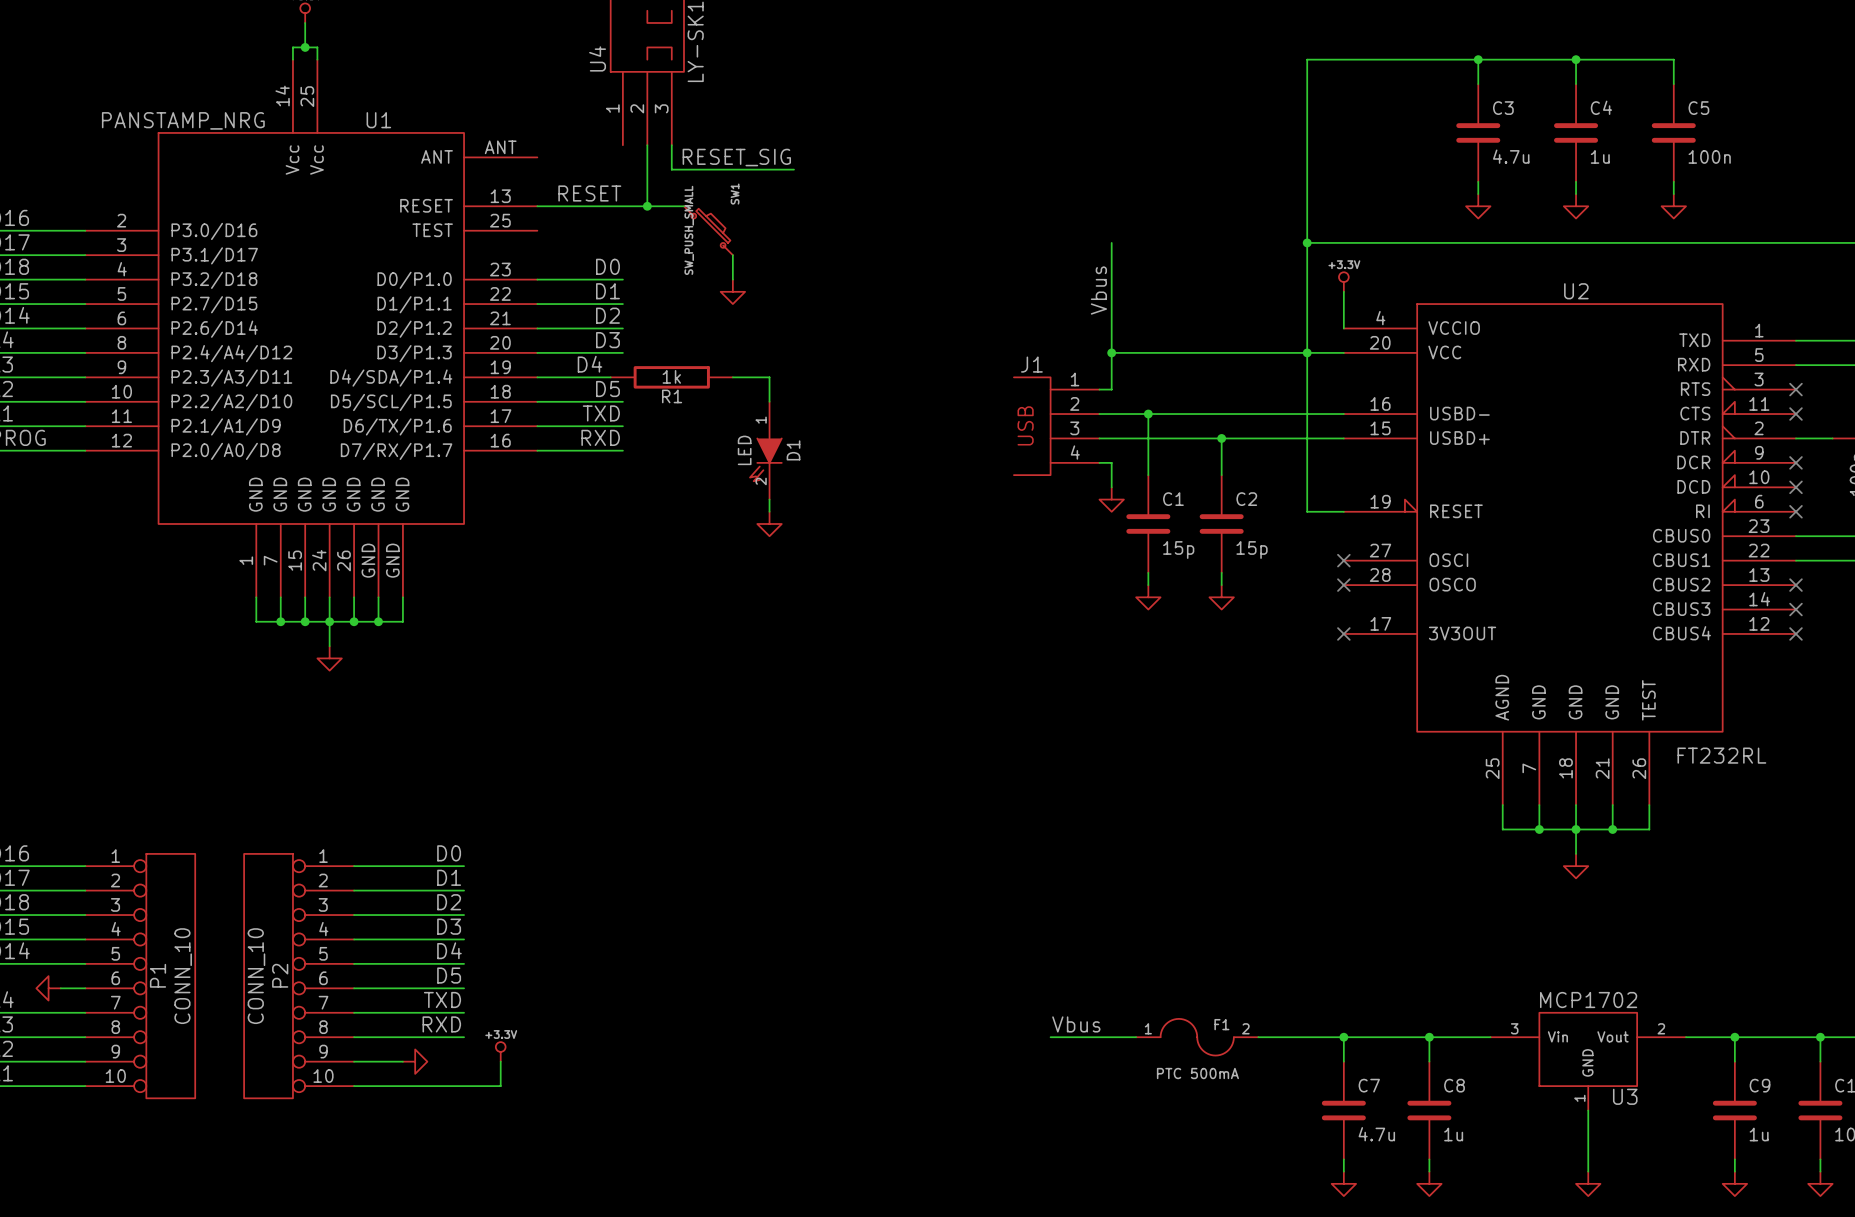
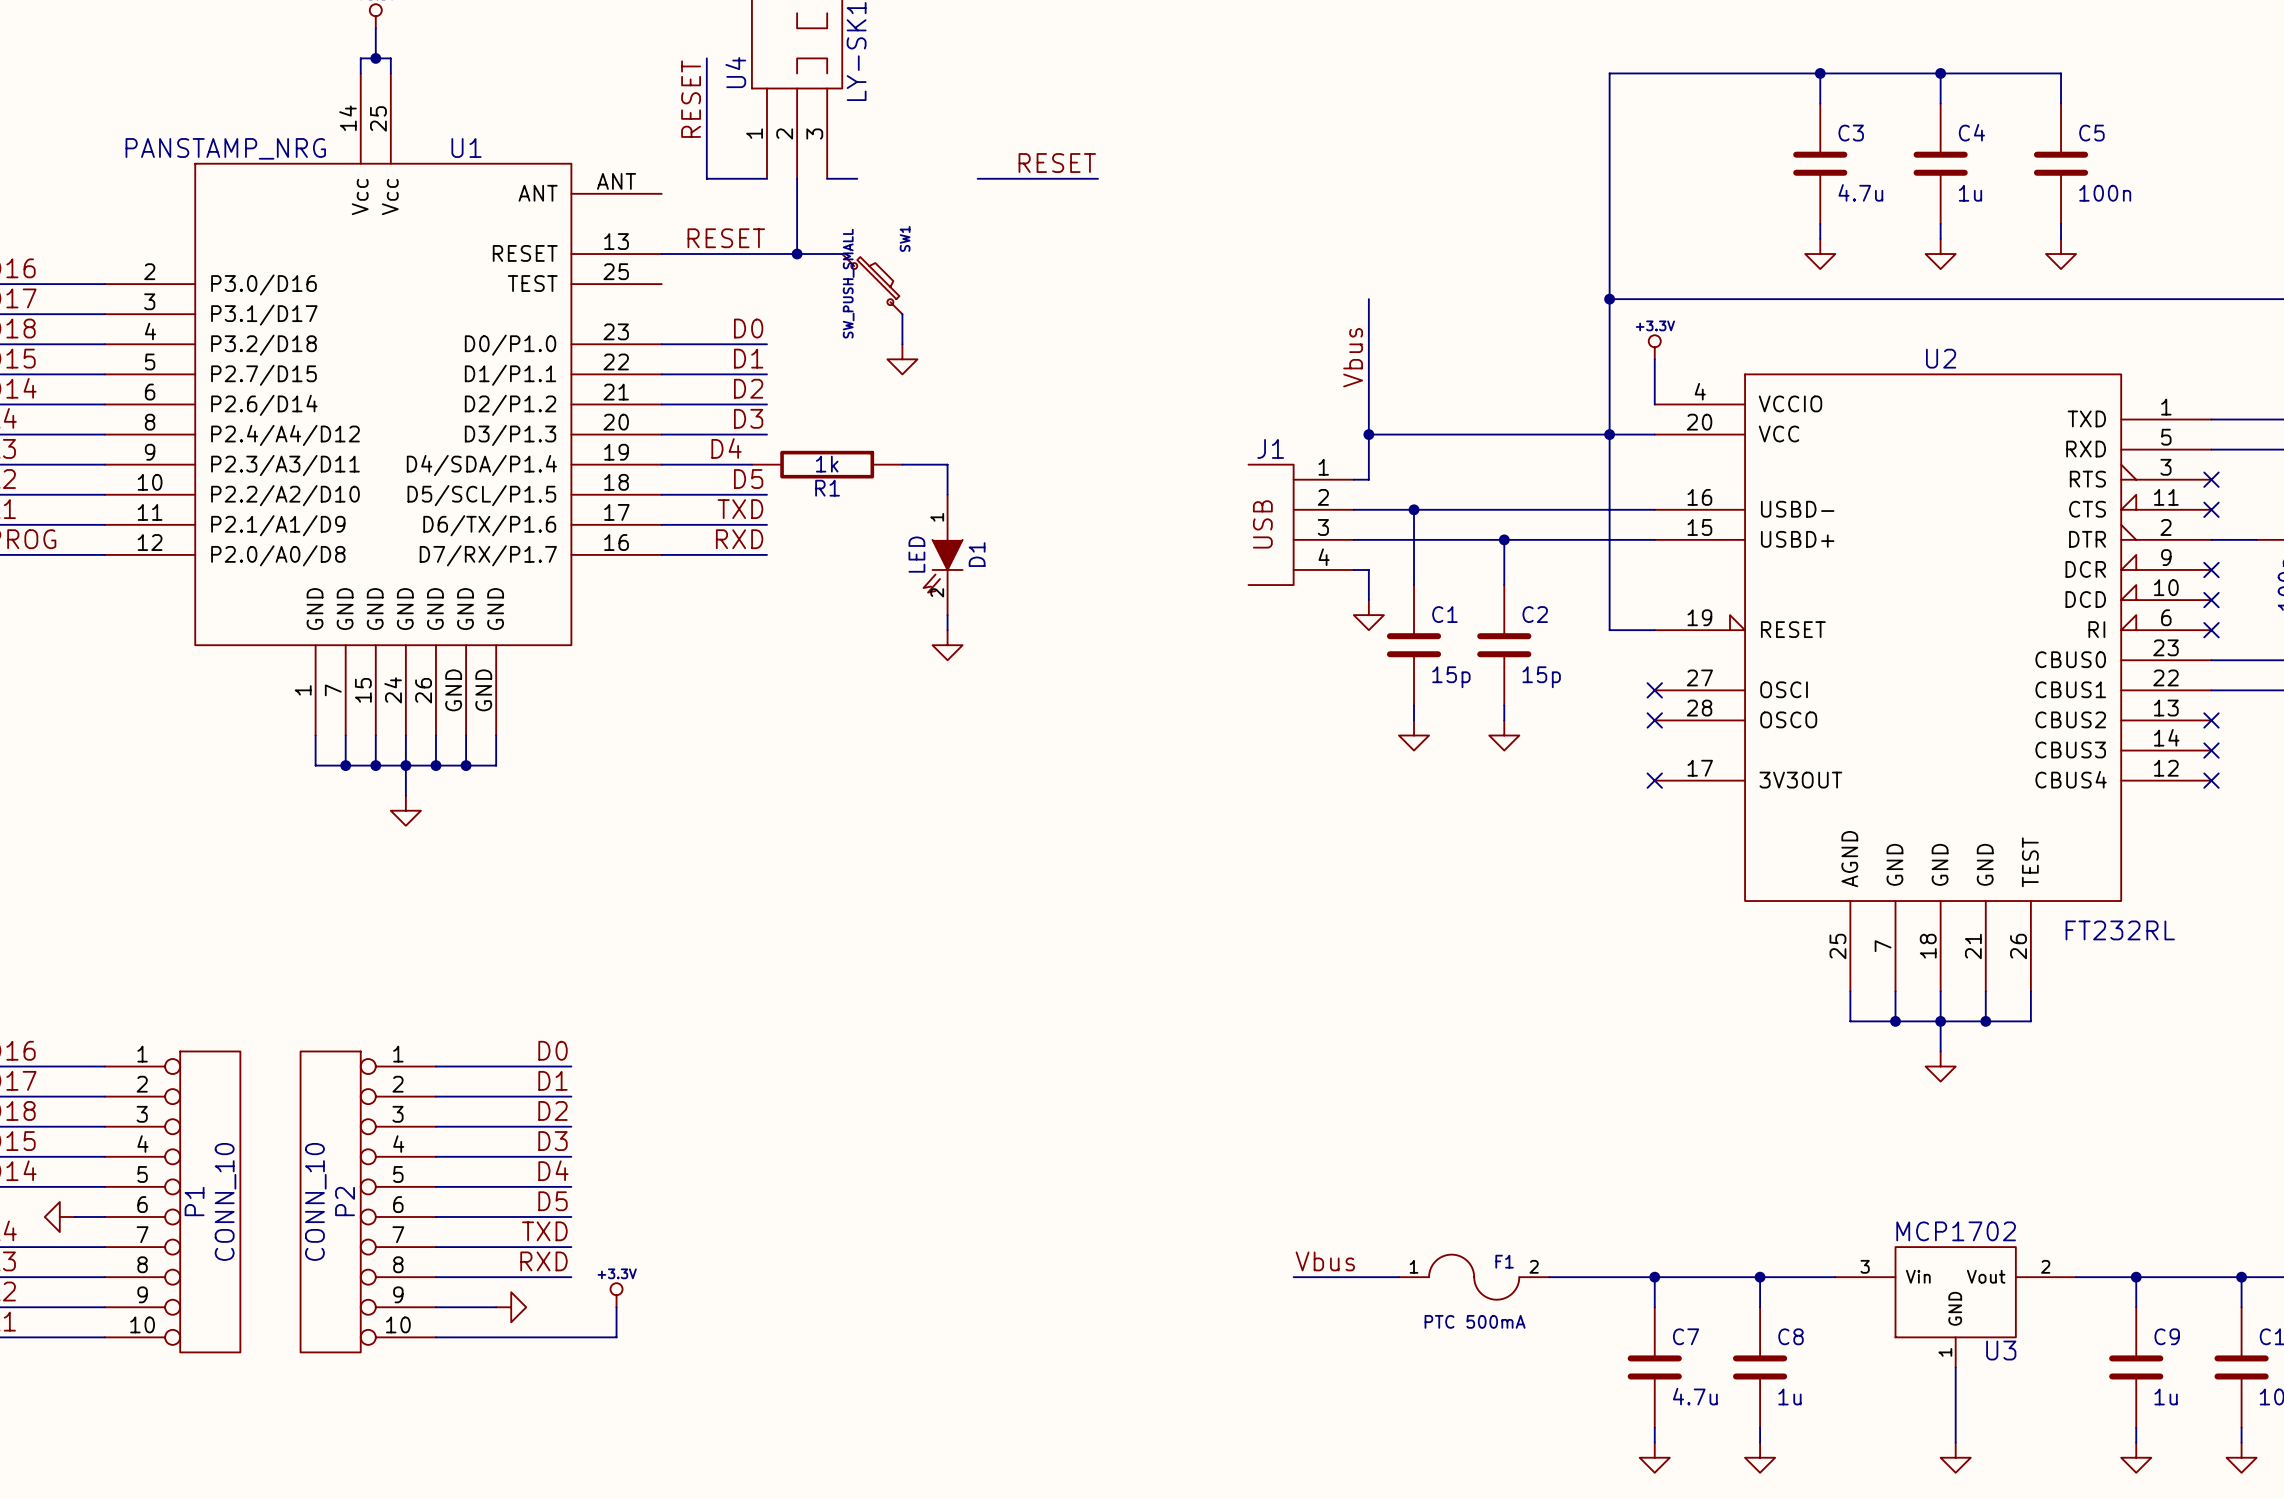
wire: none -> (706, 58) (706, 178) (767, 178)
label: none -> RESET (691, 99)
label: none -> RESET (1057, 163)
wire: (671, 145) (671, 169) (793, 169) -> (827, 178) (857, 178)
wire: none -> (977, 178) (1098, 178)
label: RESET_SIG (736, 157) -> none

